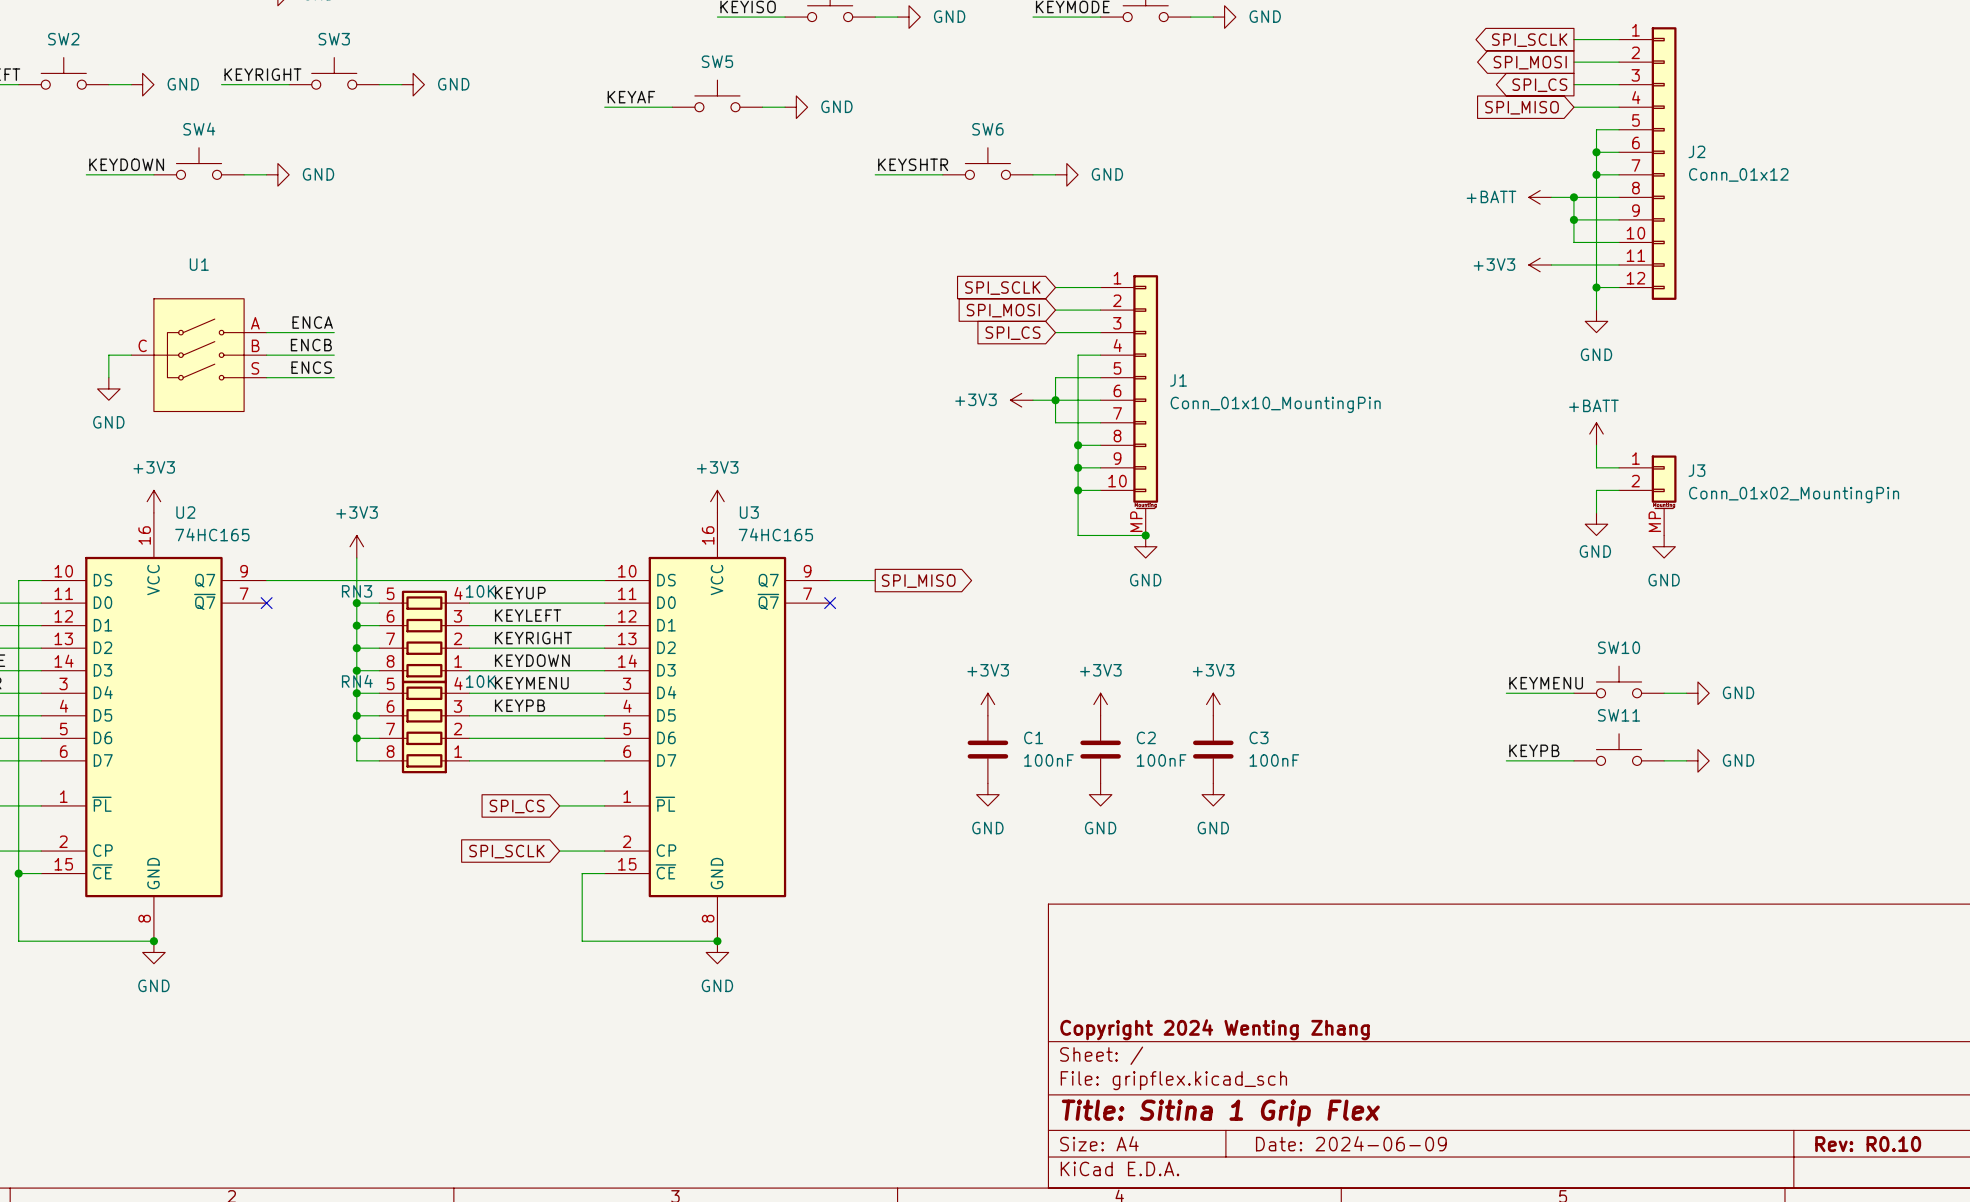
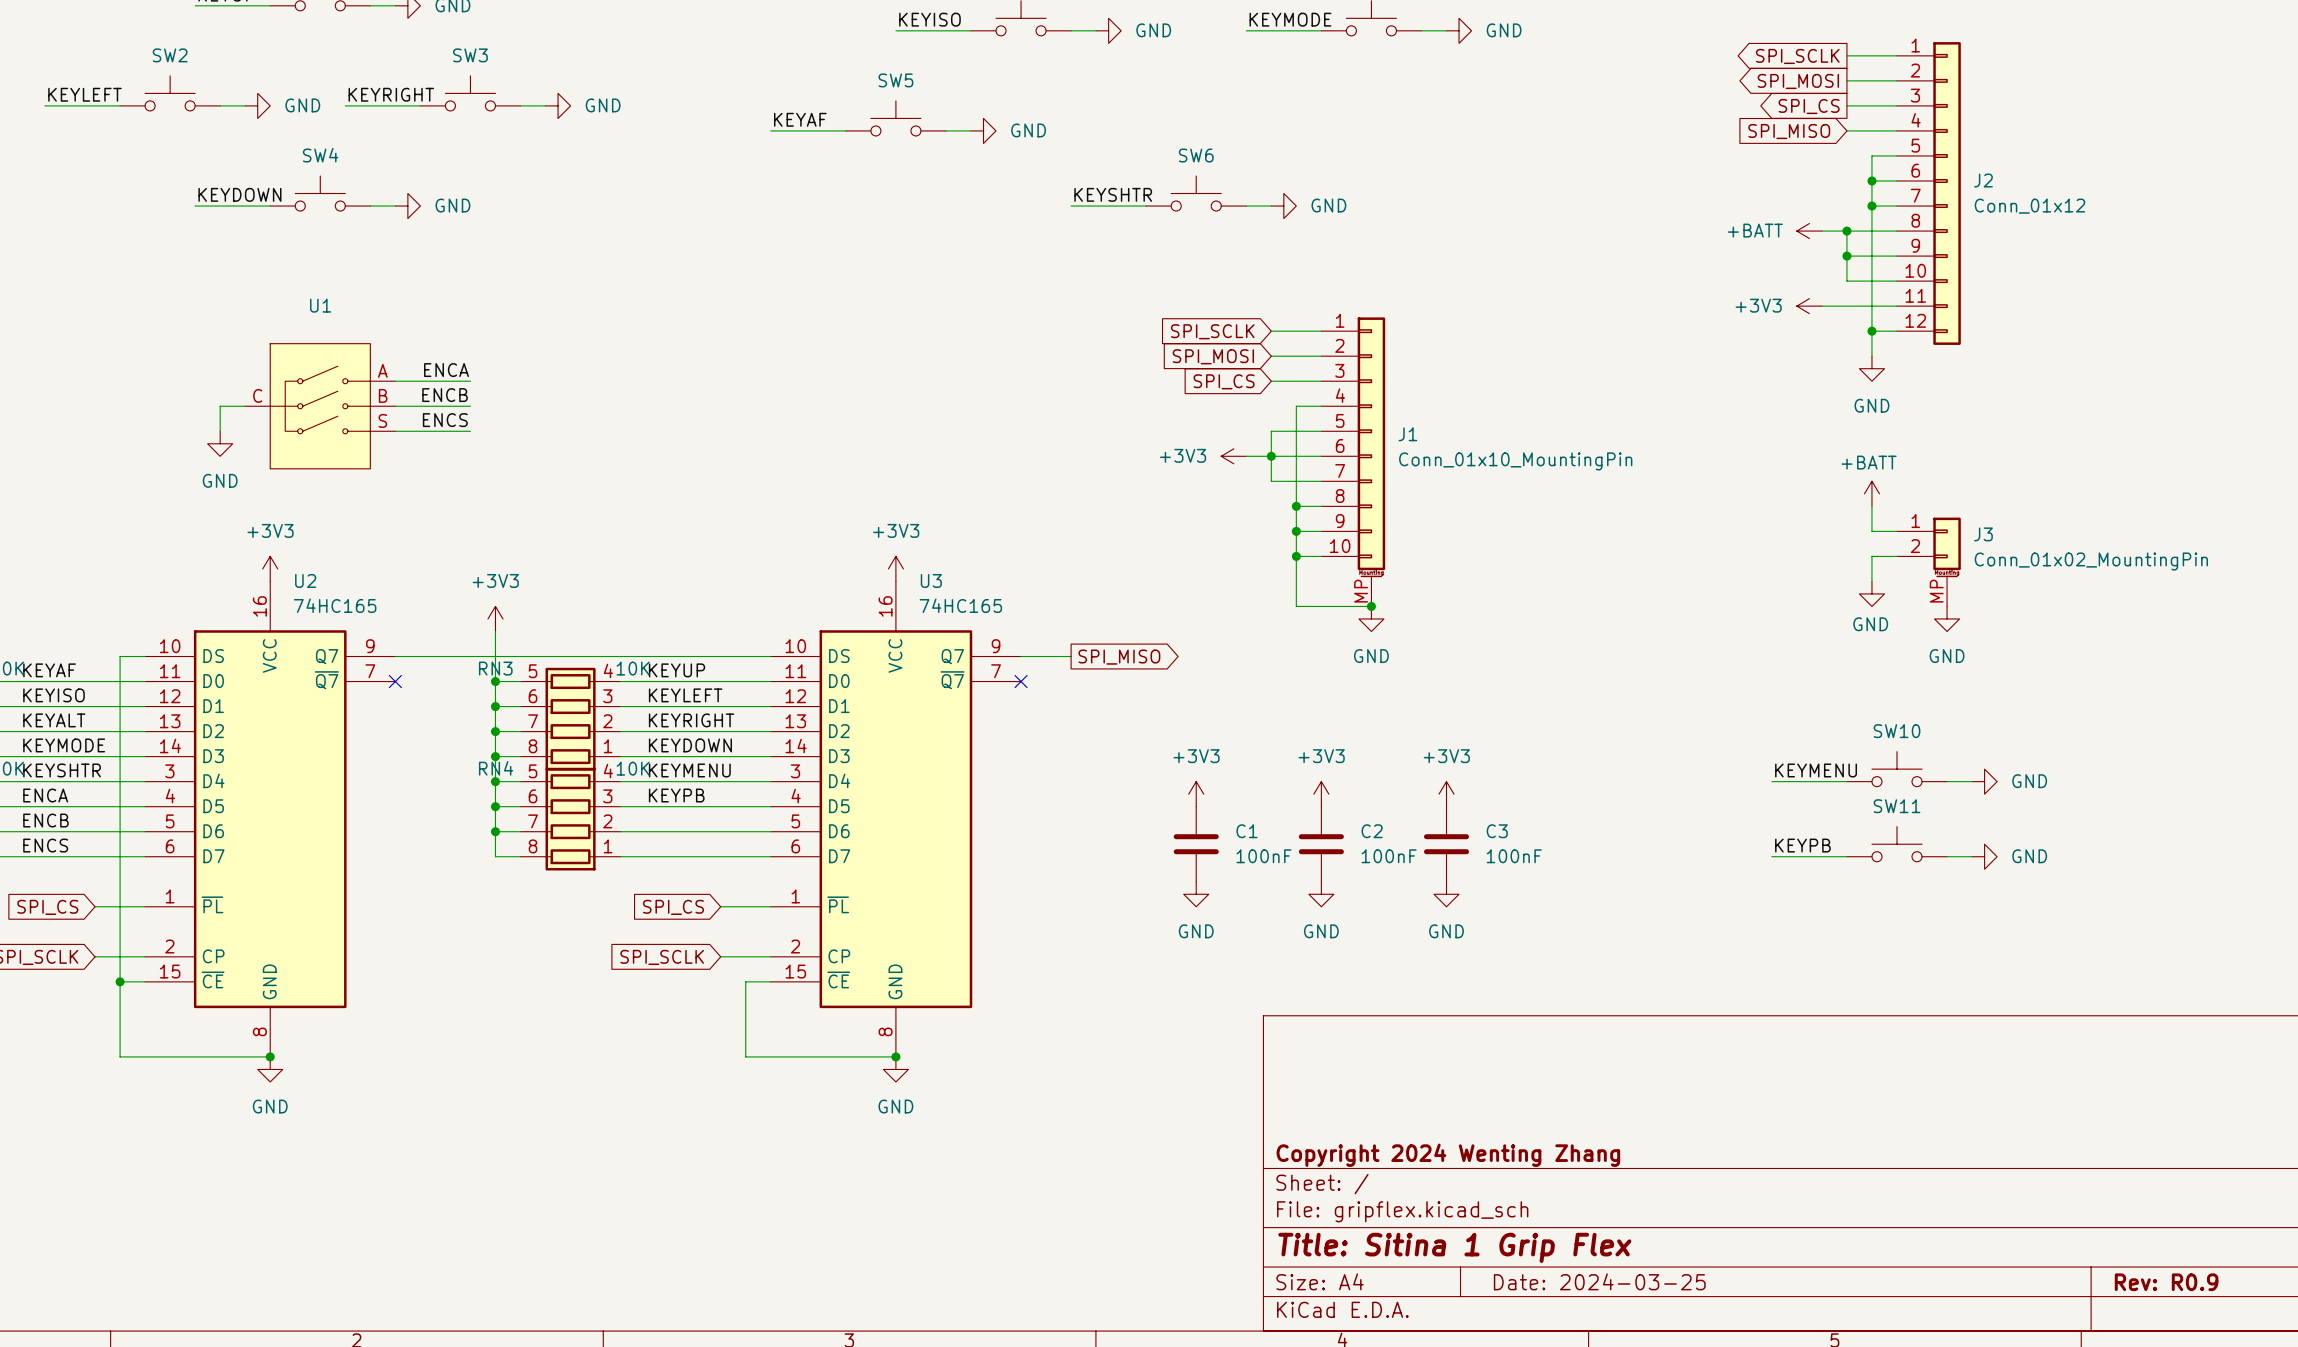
title block: Date: 2024-06-09 (1351, 1143) -> Date: 2024-03-25 (1599, 1281)
title block: Rev: R0.10 (1868, 1144) -> Rev: R0.9 (2166, 1282)

